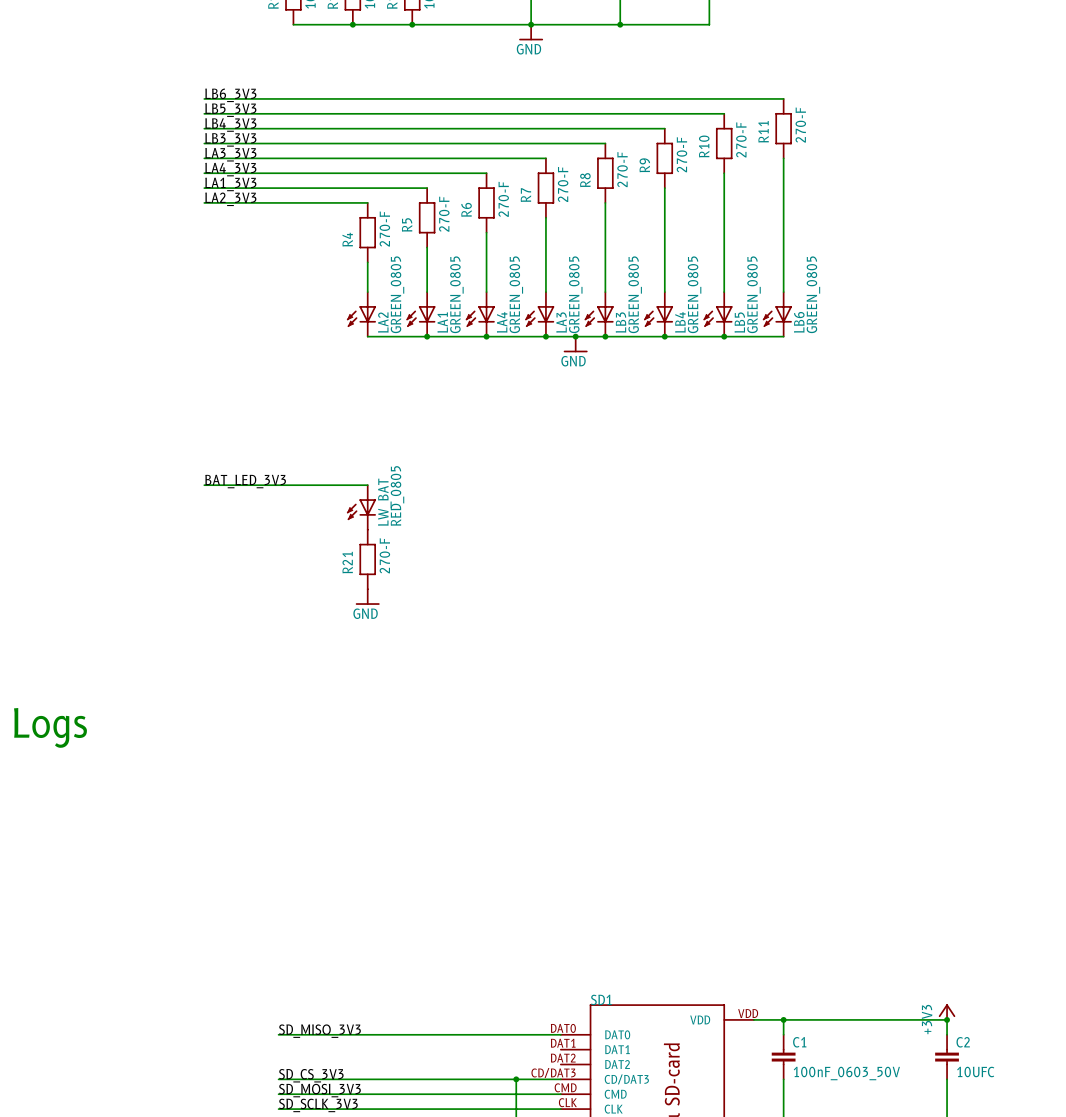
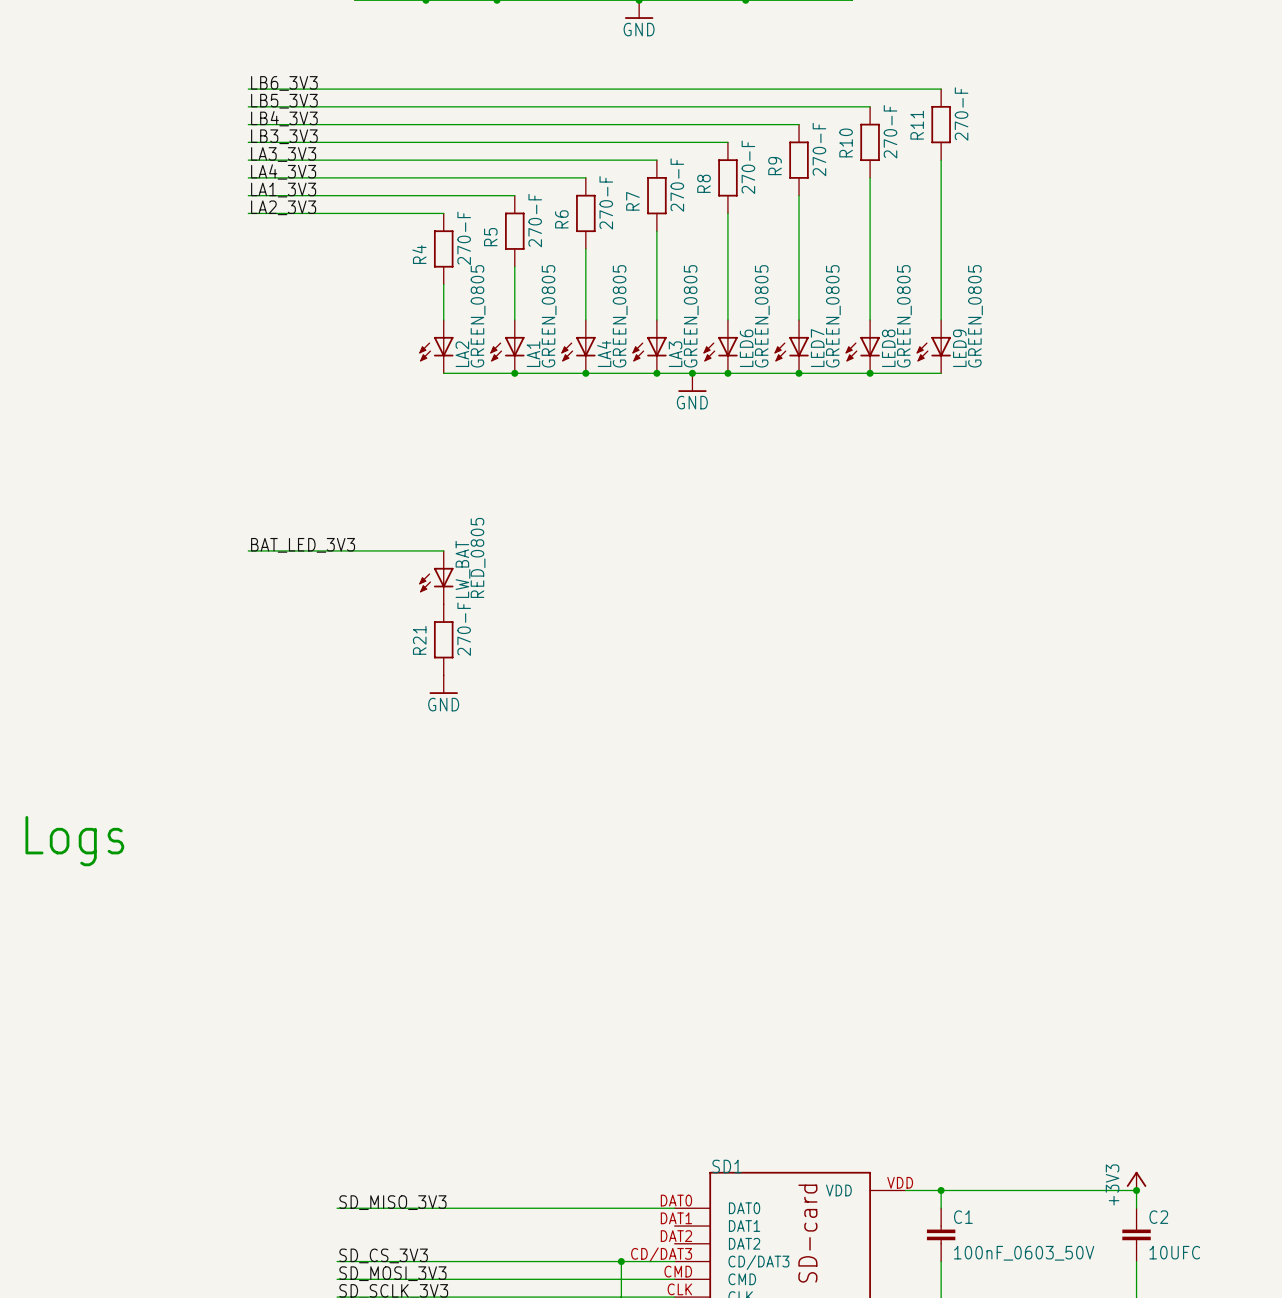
LB3 name: LB3 (620, 322) -> LED6 (746, 348)
LB4 name: LB4 (680, 322) -> LED7 (817, 348)
LB5 name: LB5 (739, 322) -> LED8 (888, 348)
LB6 name: LB6 (799, 322) -> LED9 (959, 348)

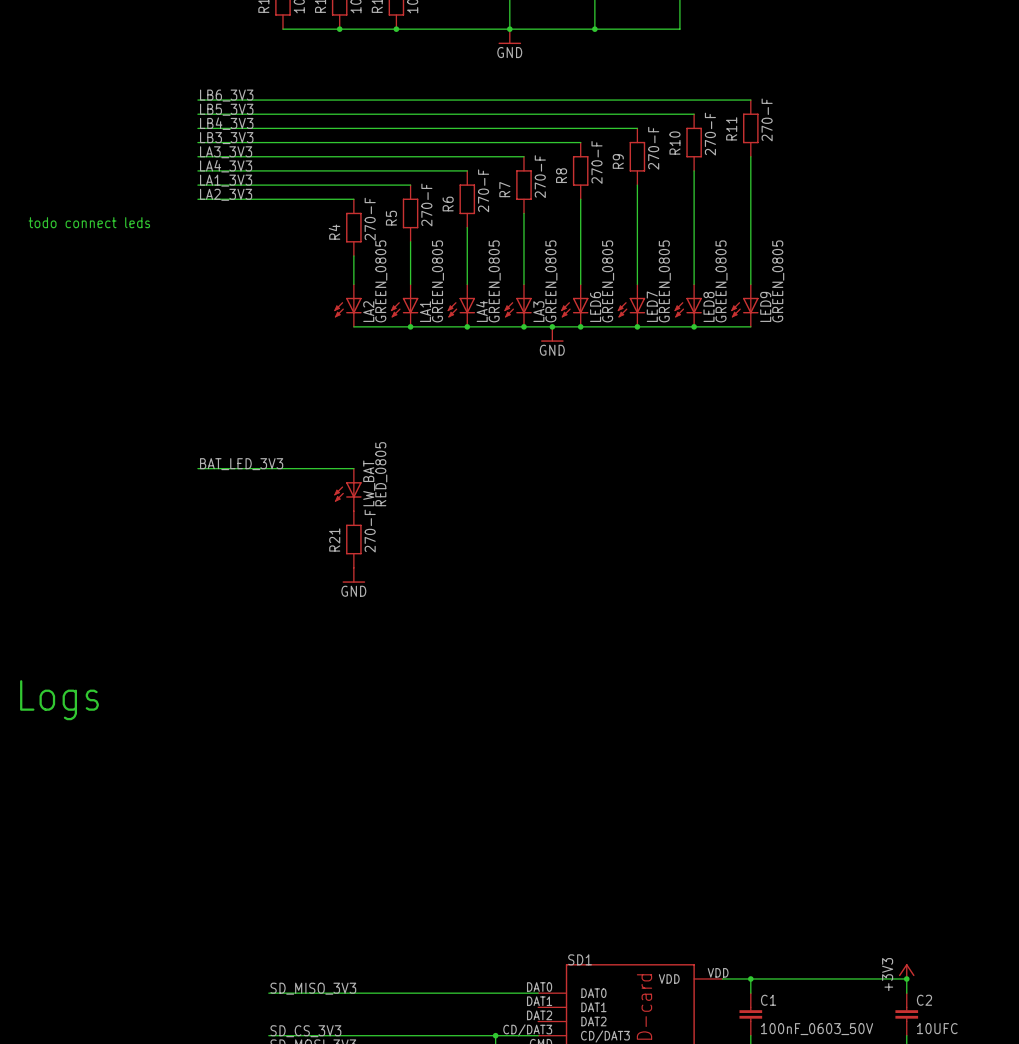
text: none -> todo connect leds (89, 222)

